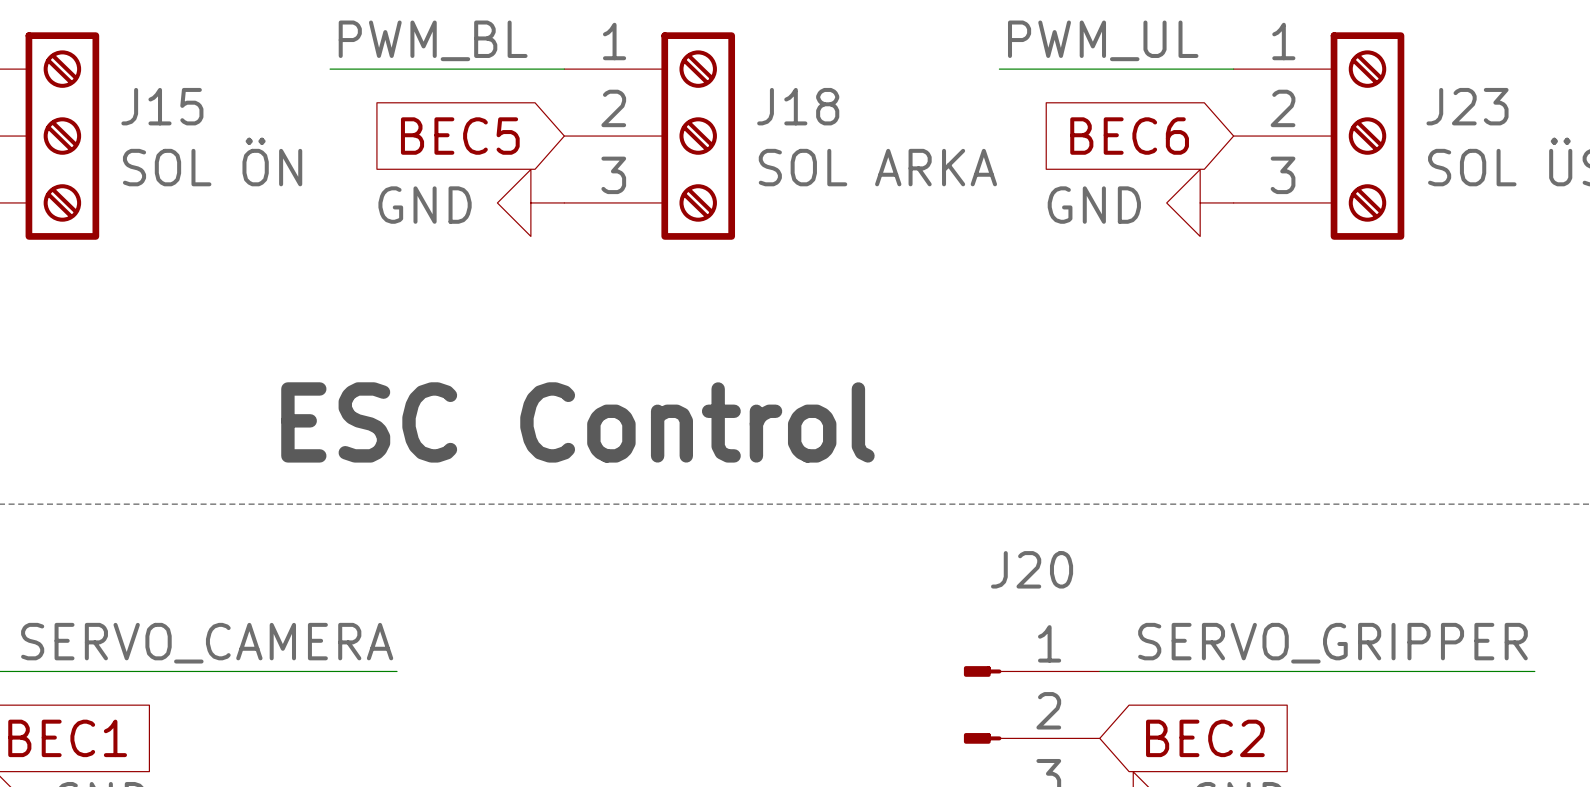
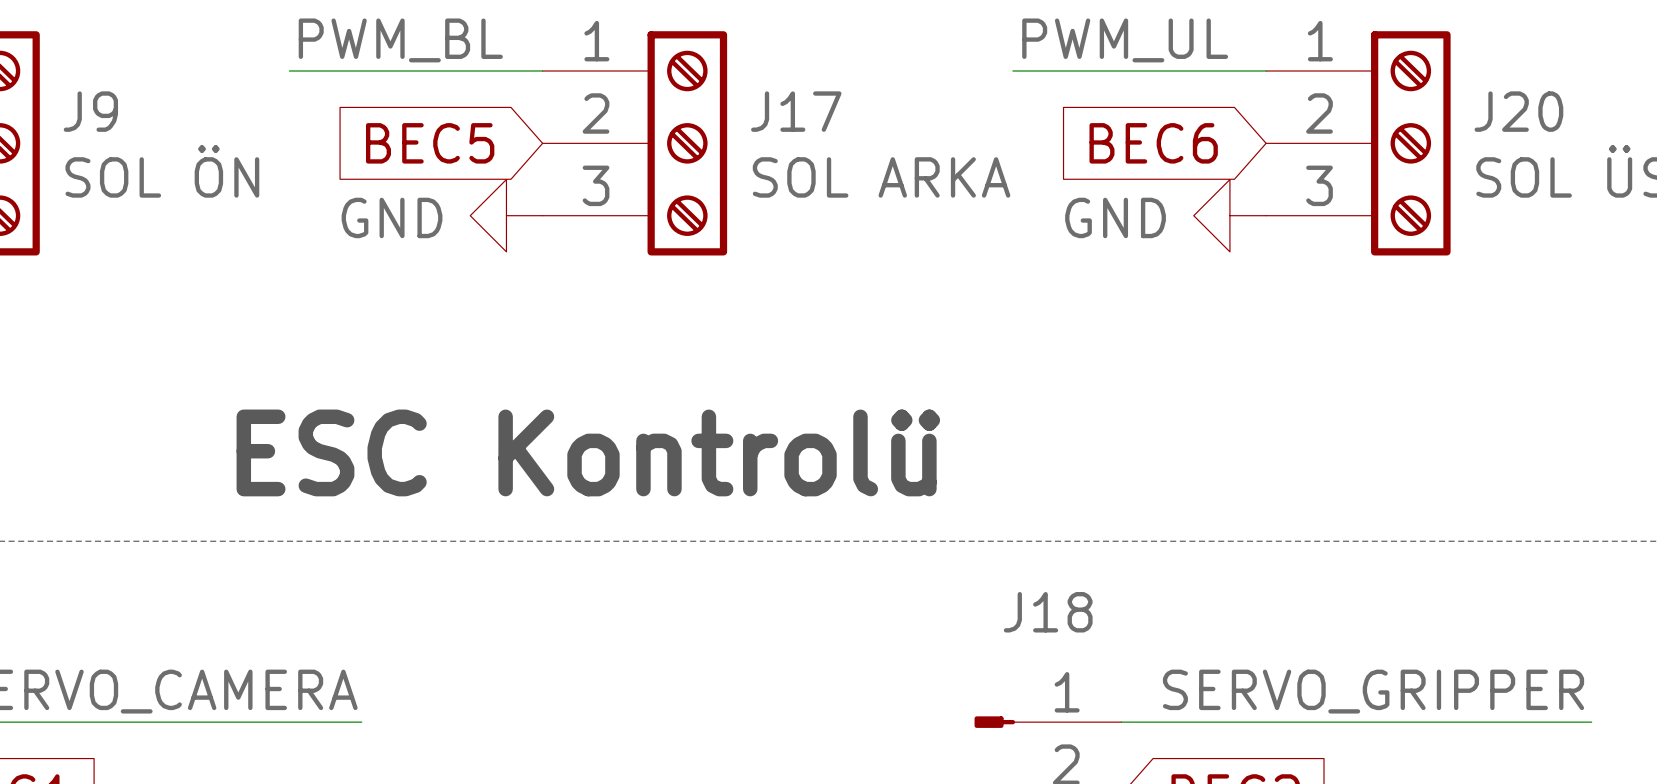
J15 name: J15 (162, 106) -> J9 (90, 111)
J18 name: J18 (798, 106) -> J17 (796, 111)
J23 name: J23 (1467, 106) -> J20 (1518, 111)
text: ESC Control (577, 422) -> ESC Kontrolü (588, 452)
J20 name: J20 (1032, 569) -> J18 (1048, 612)

